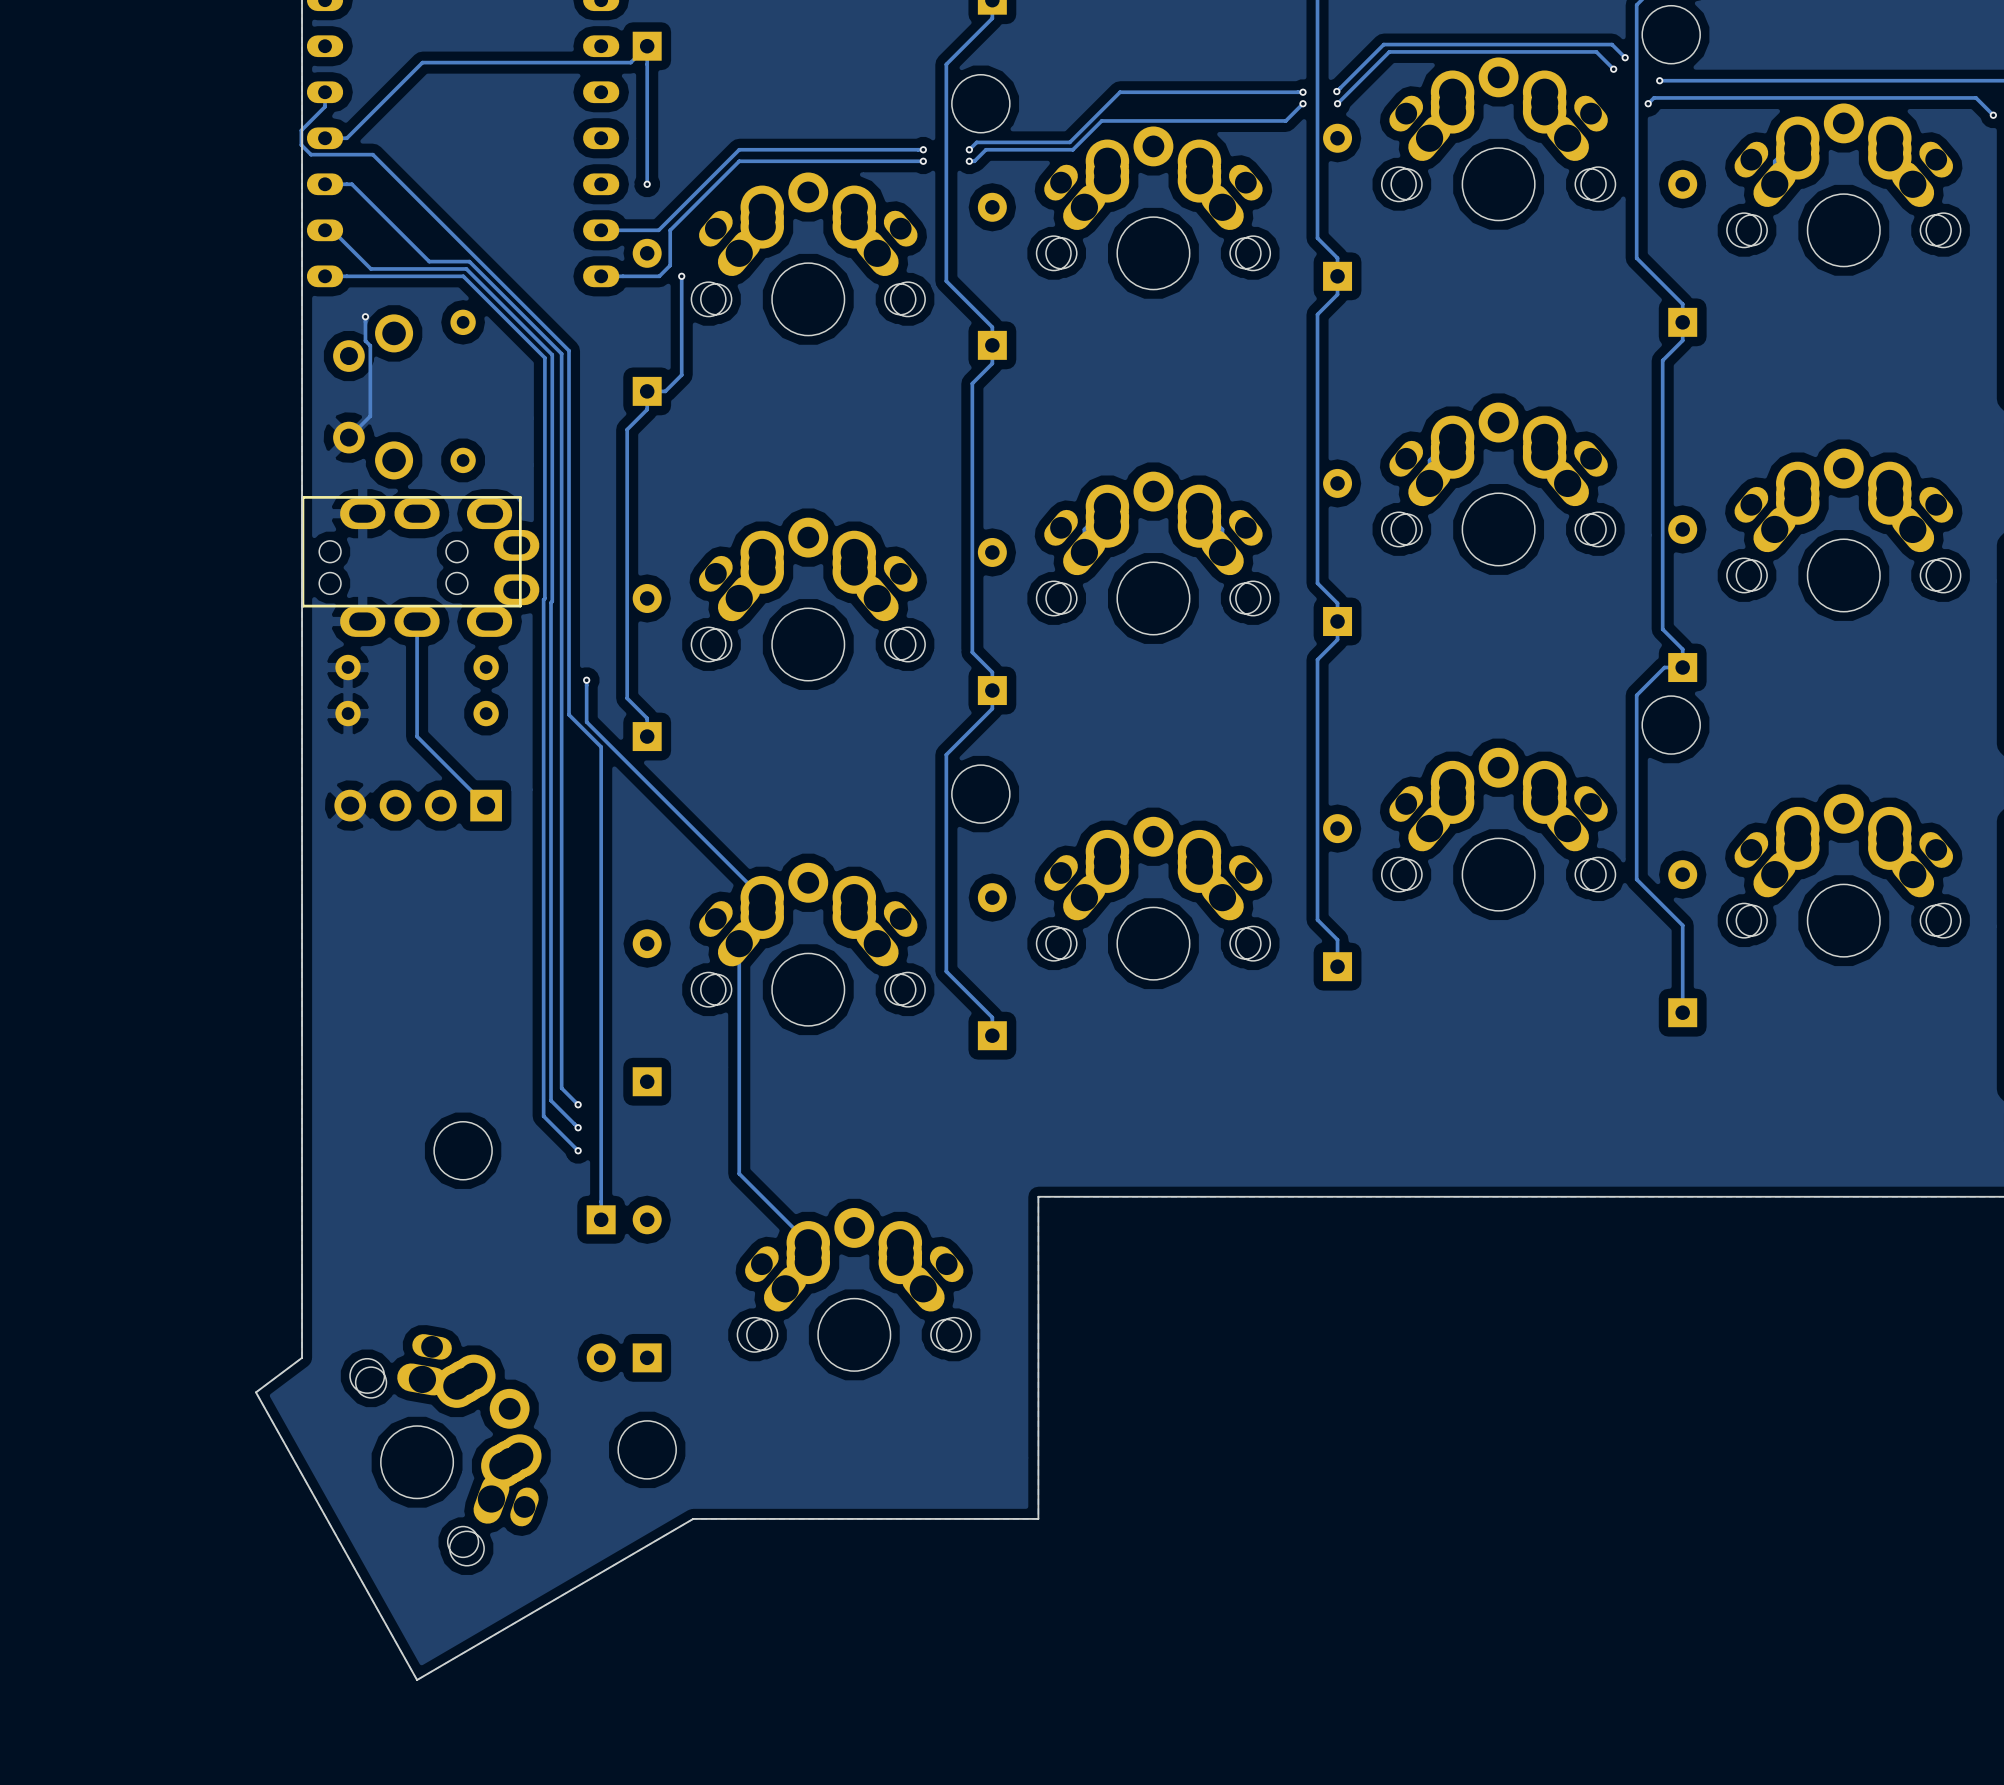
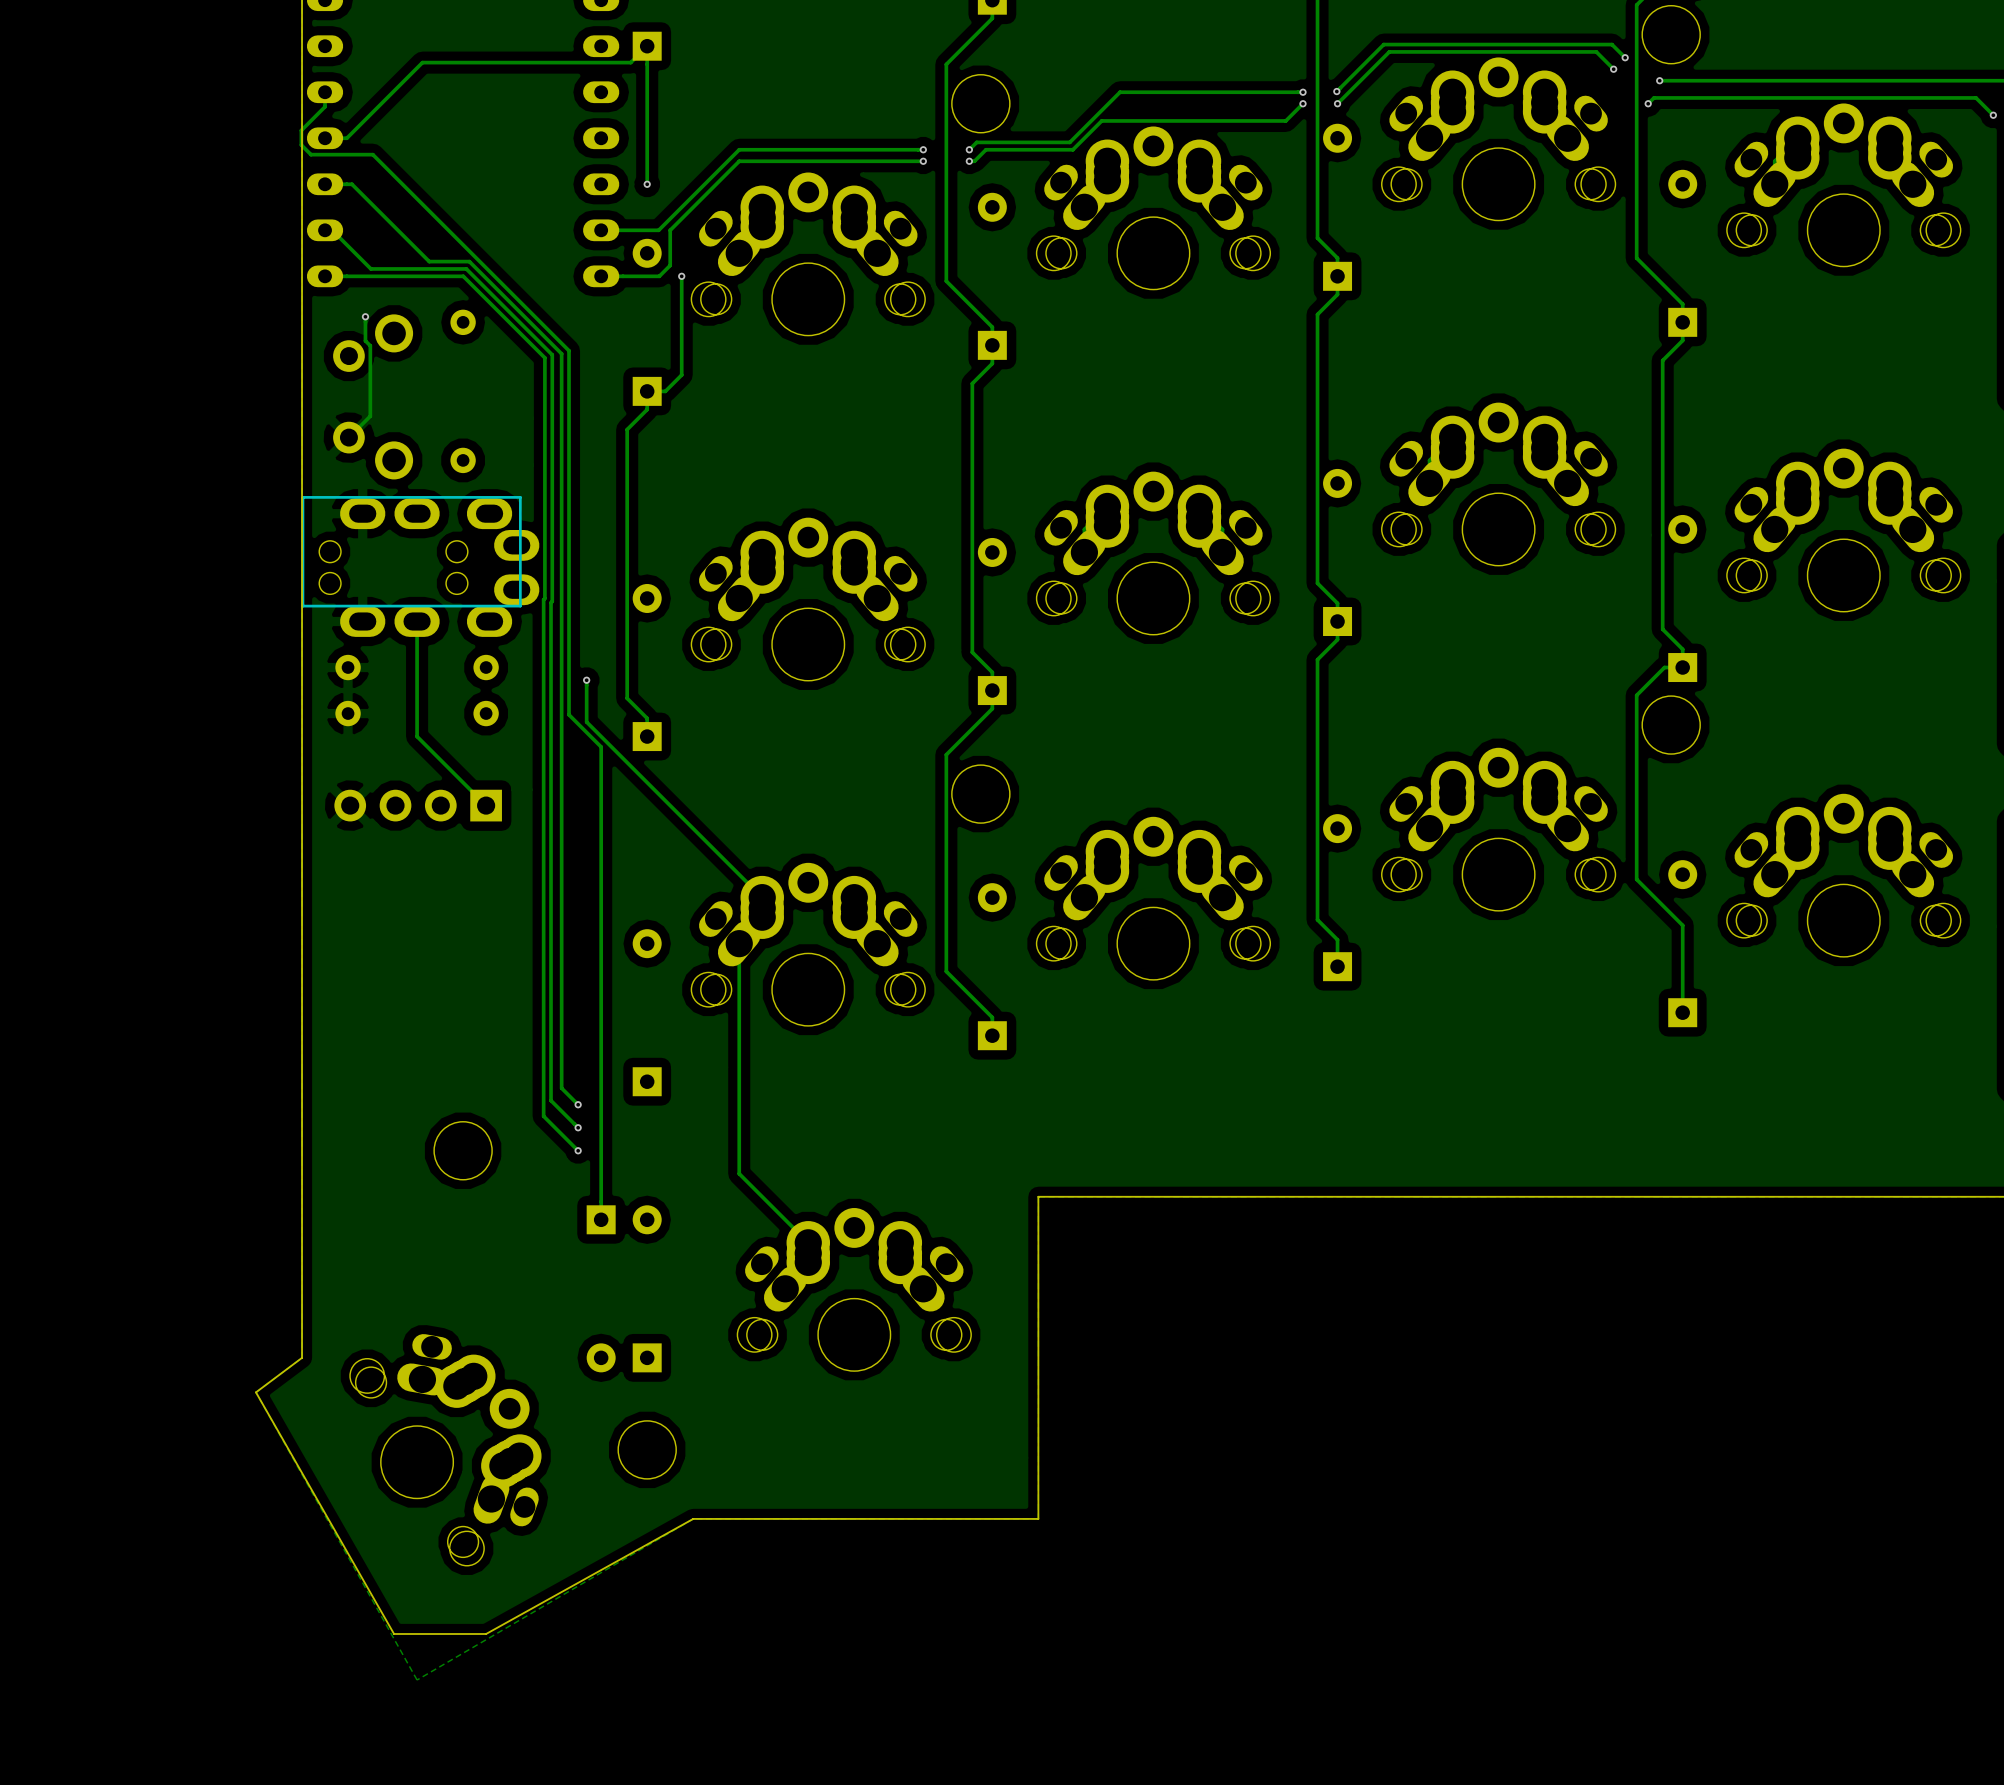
board edge: (256, 1392) (417, 1680) (693, 1518) -> (256, 1392) (394, 1634) (486, 1634) (693, 1518)

